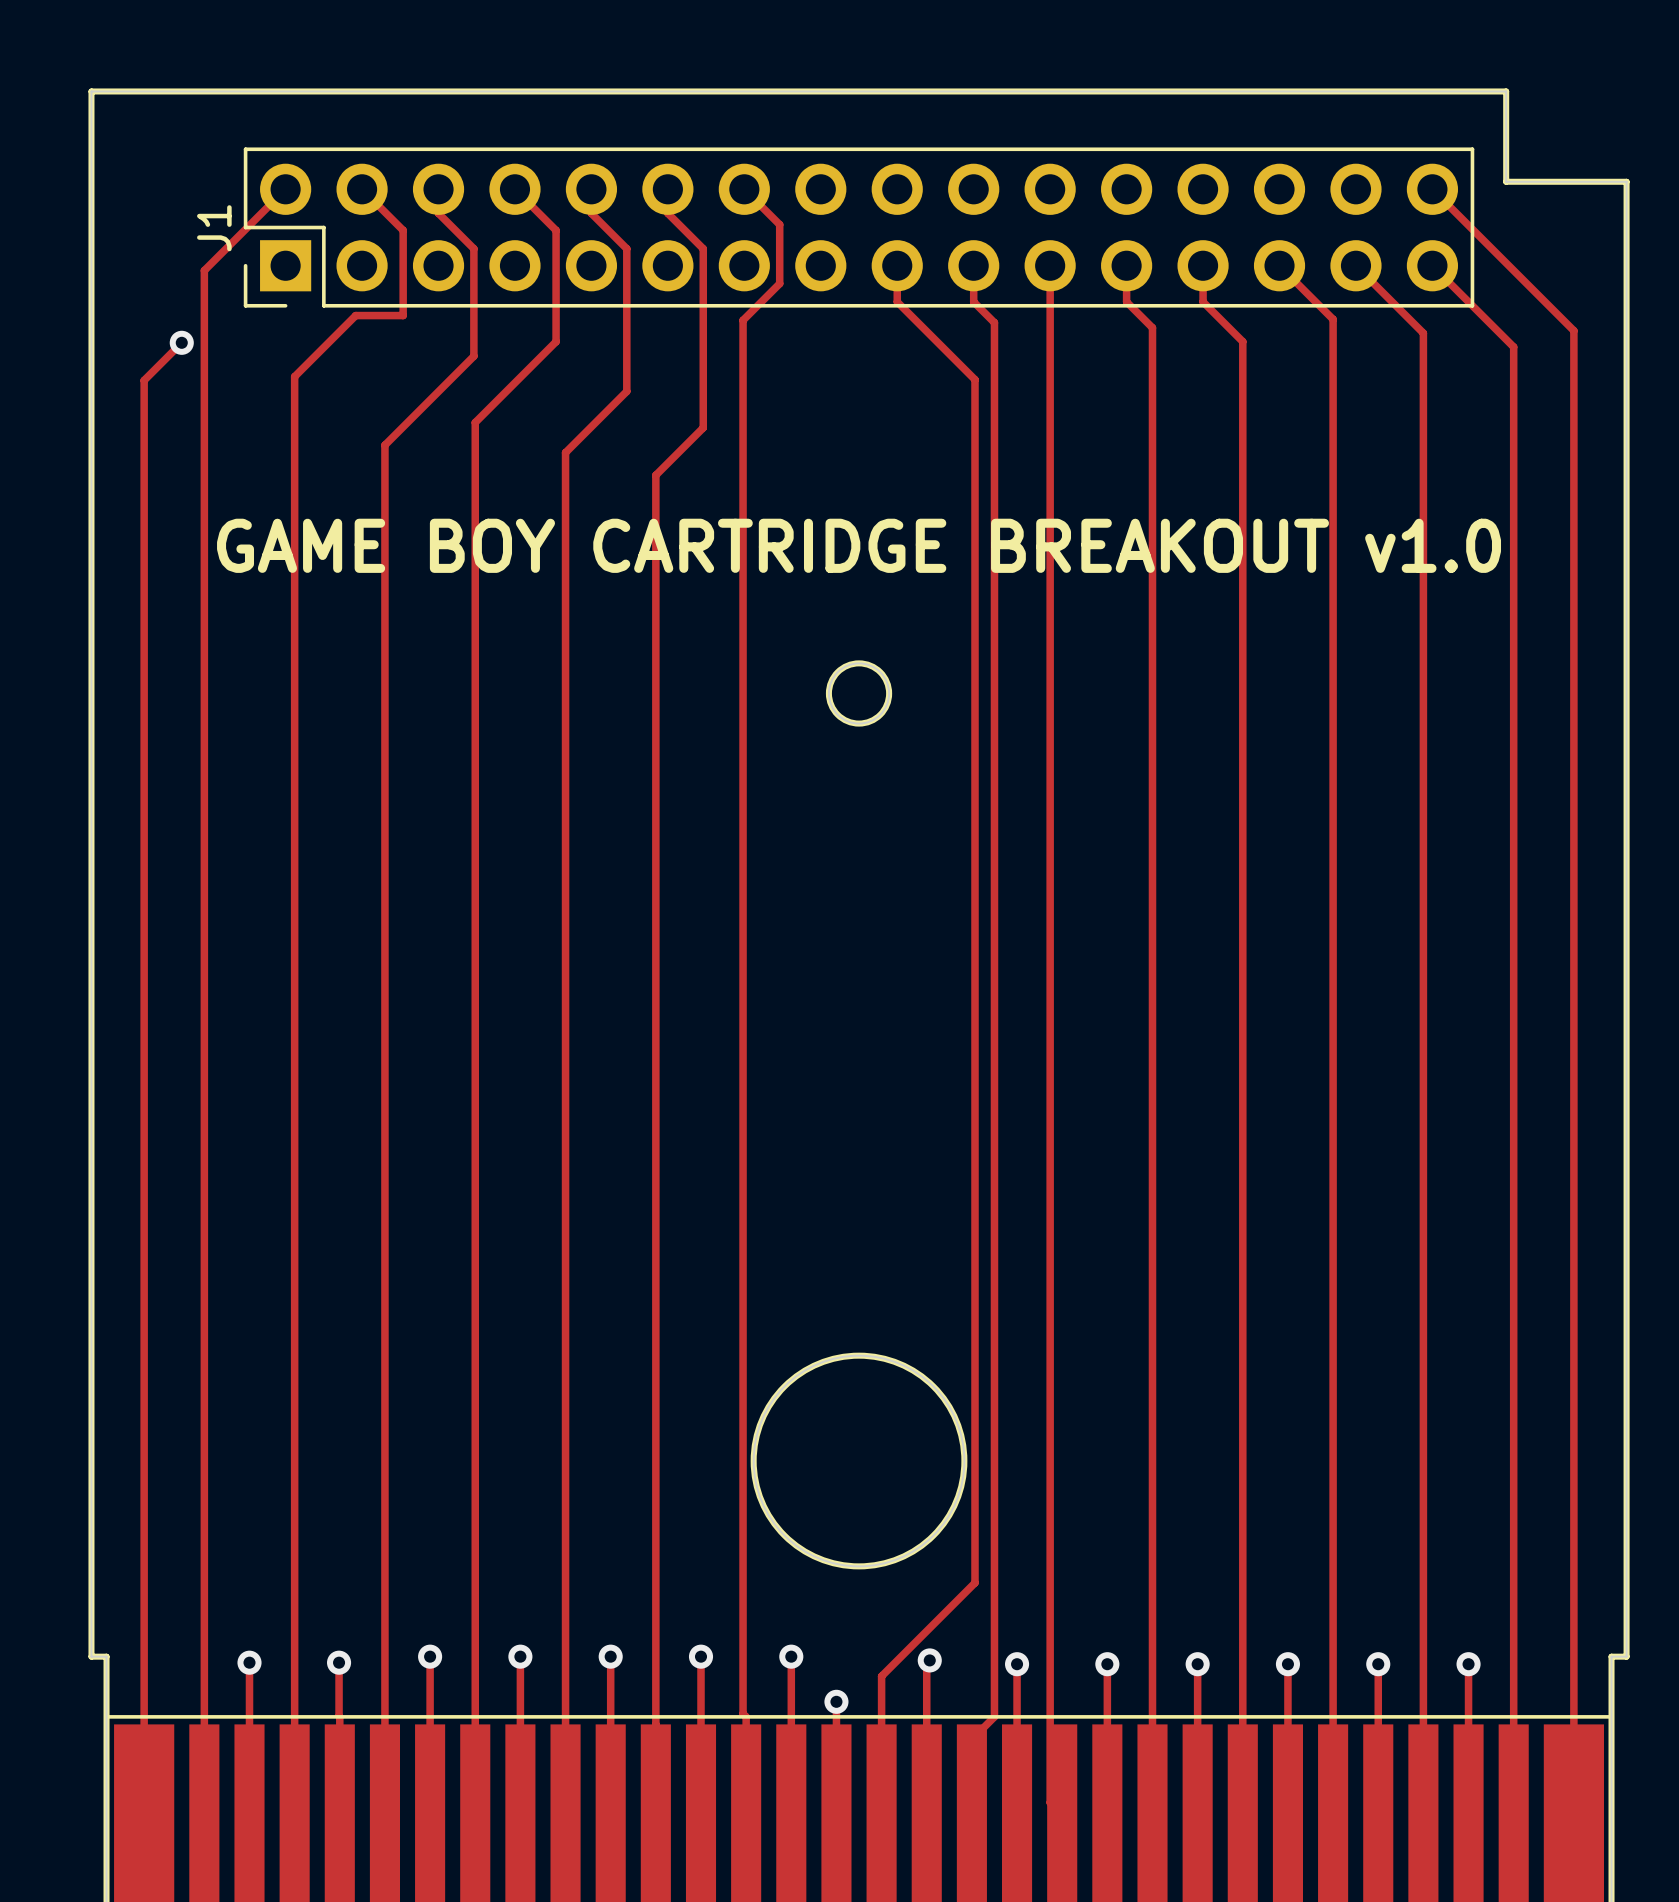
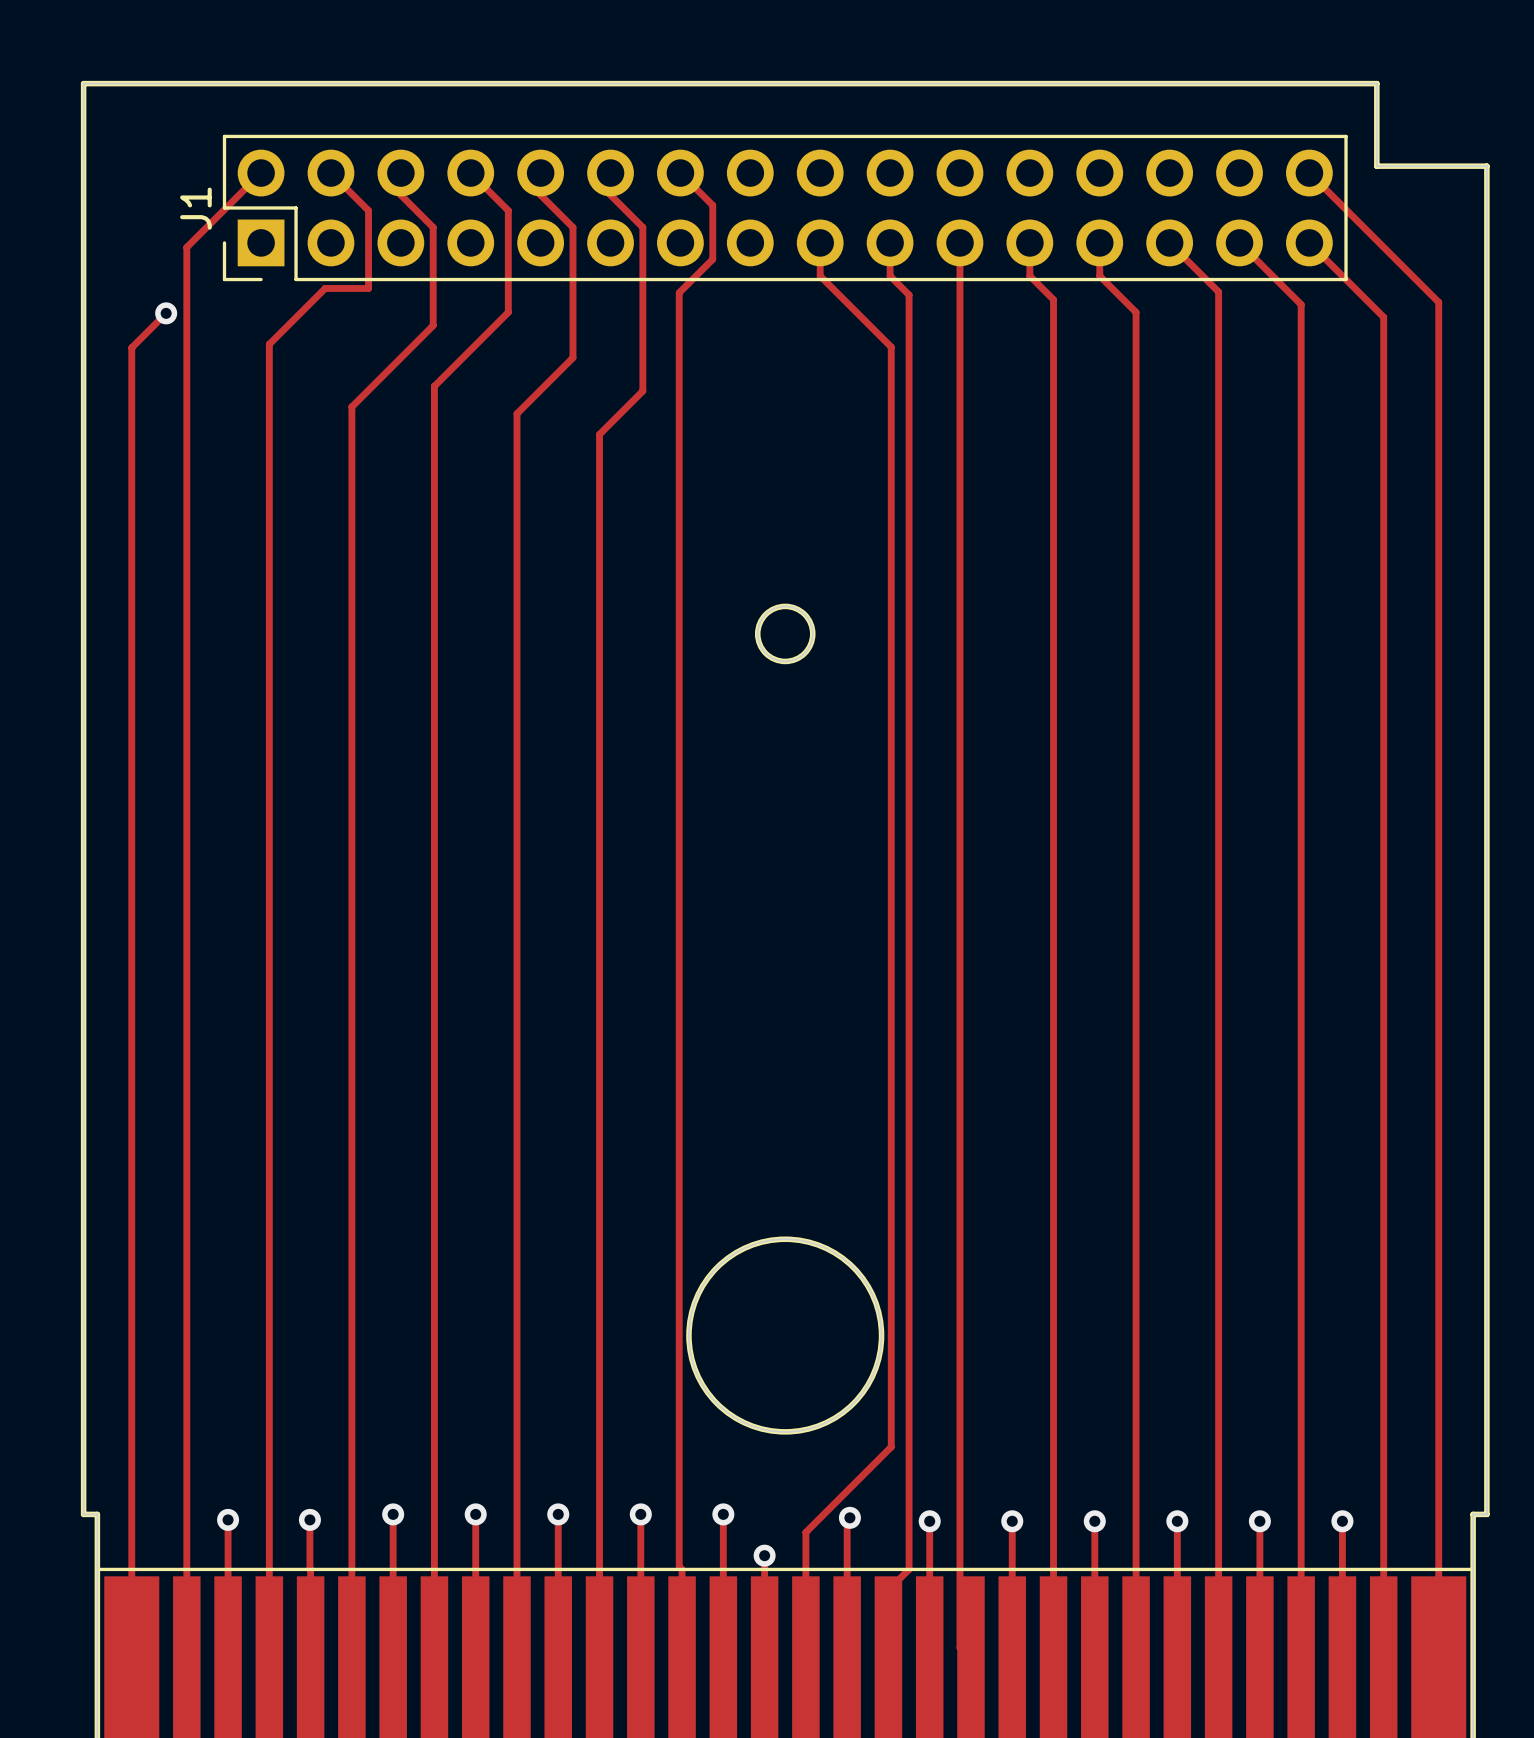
text: GAME BOY CARTRIDGE BREAKOUT v1.0 (859, 545) -> none

